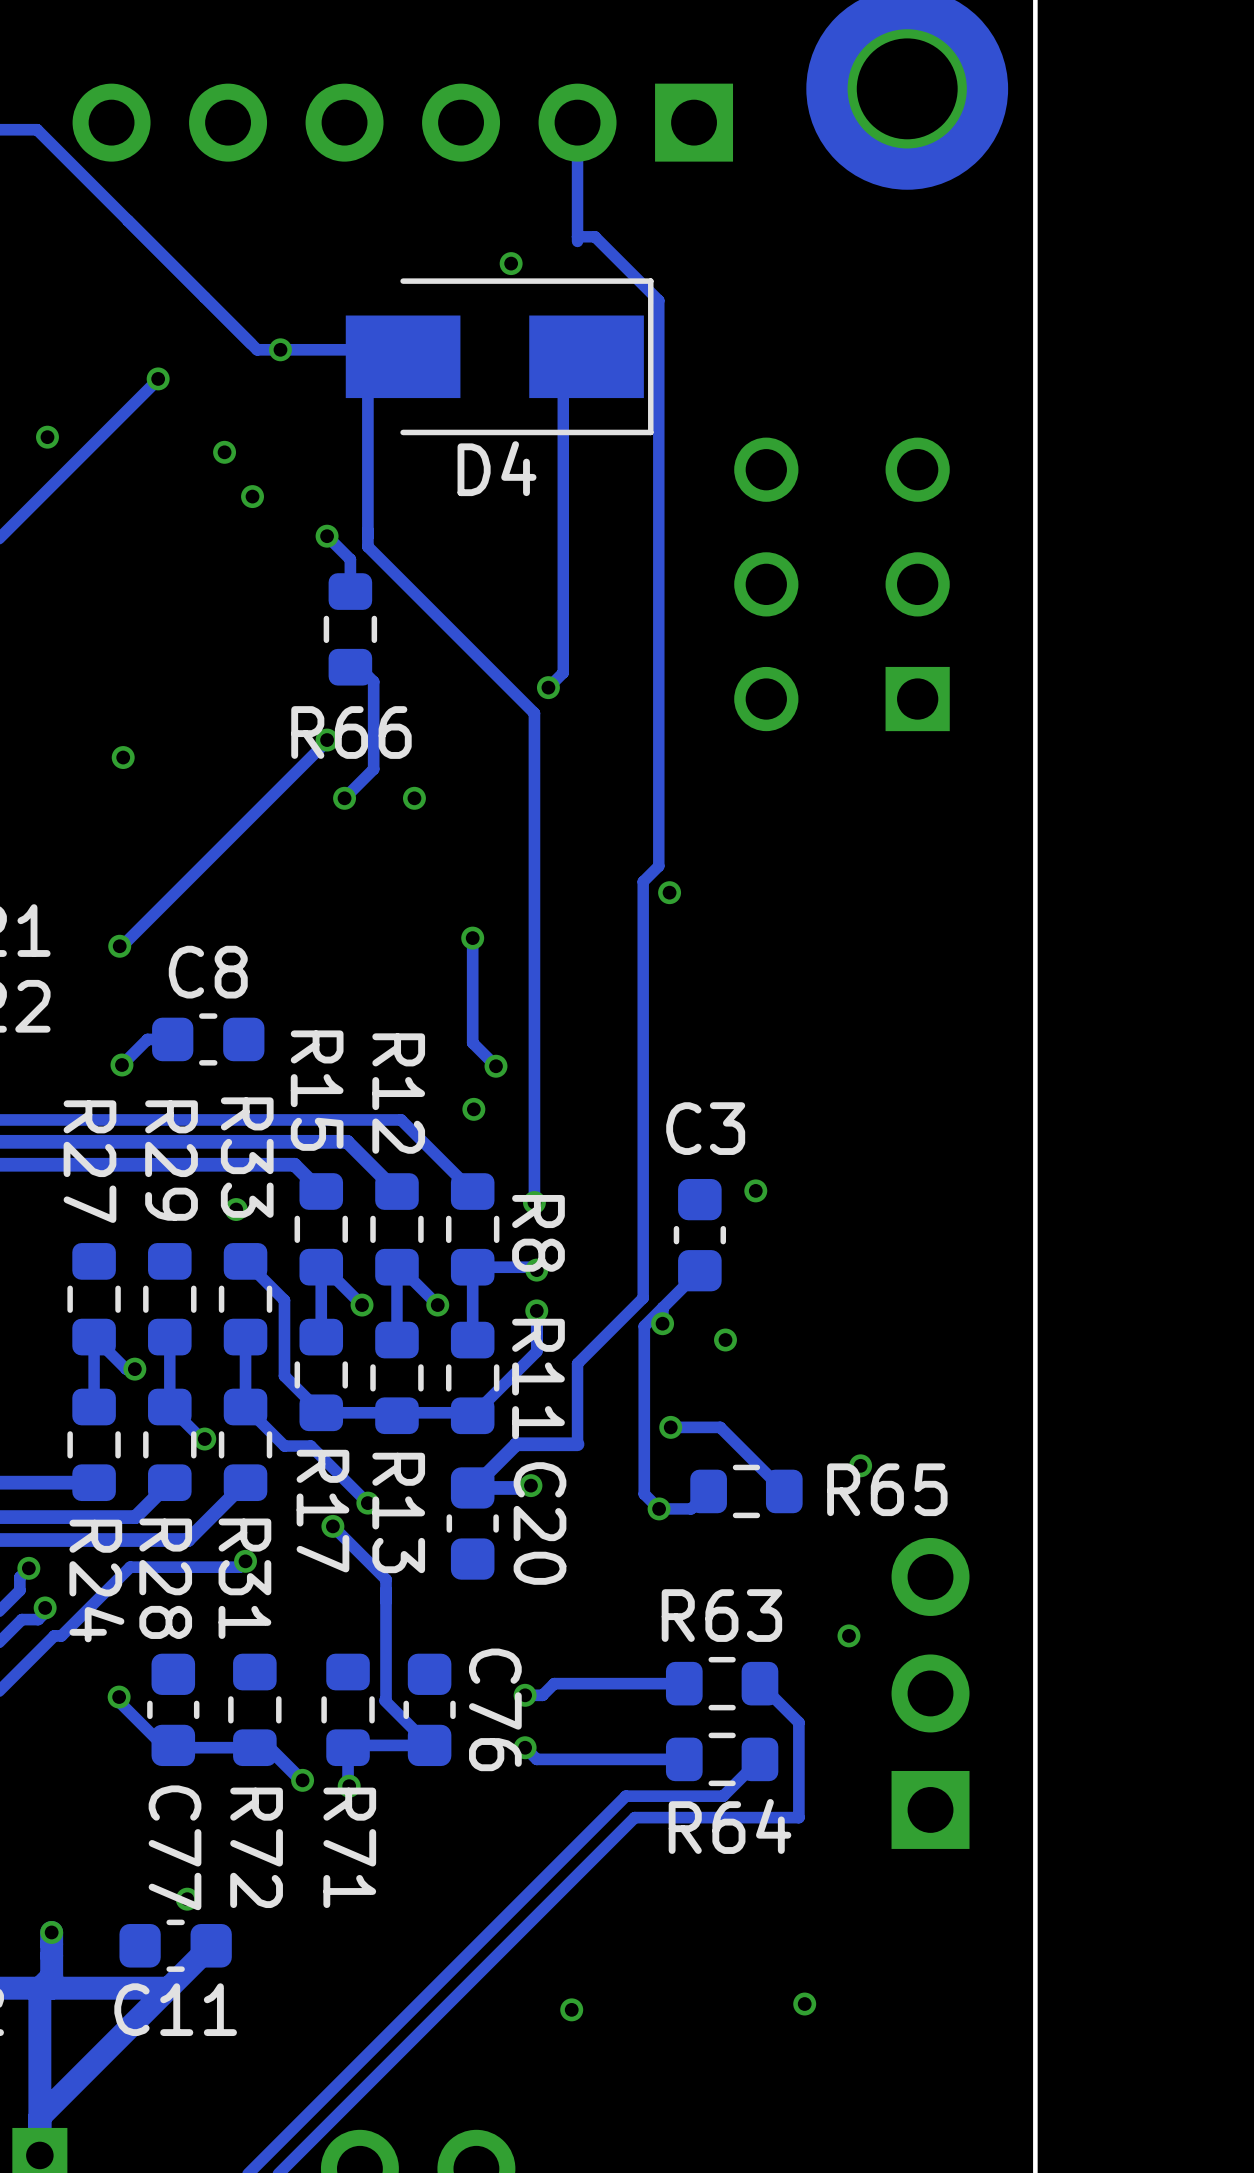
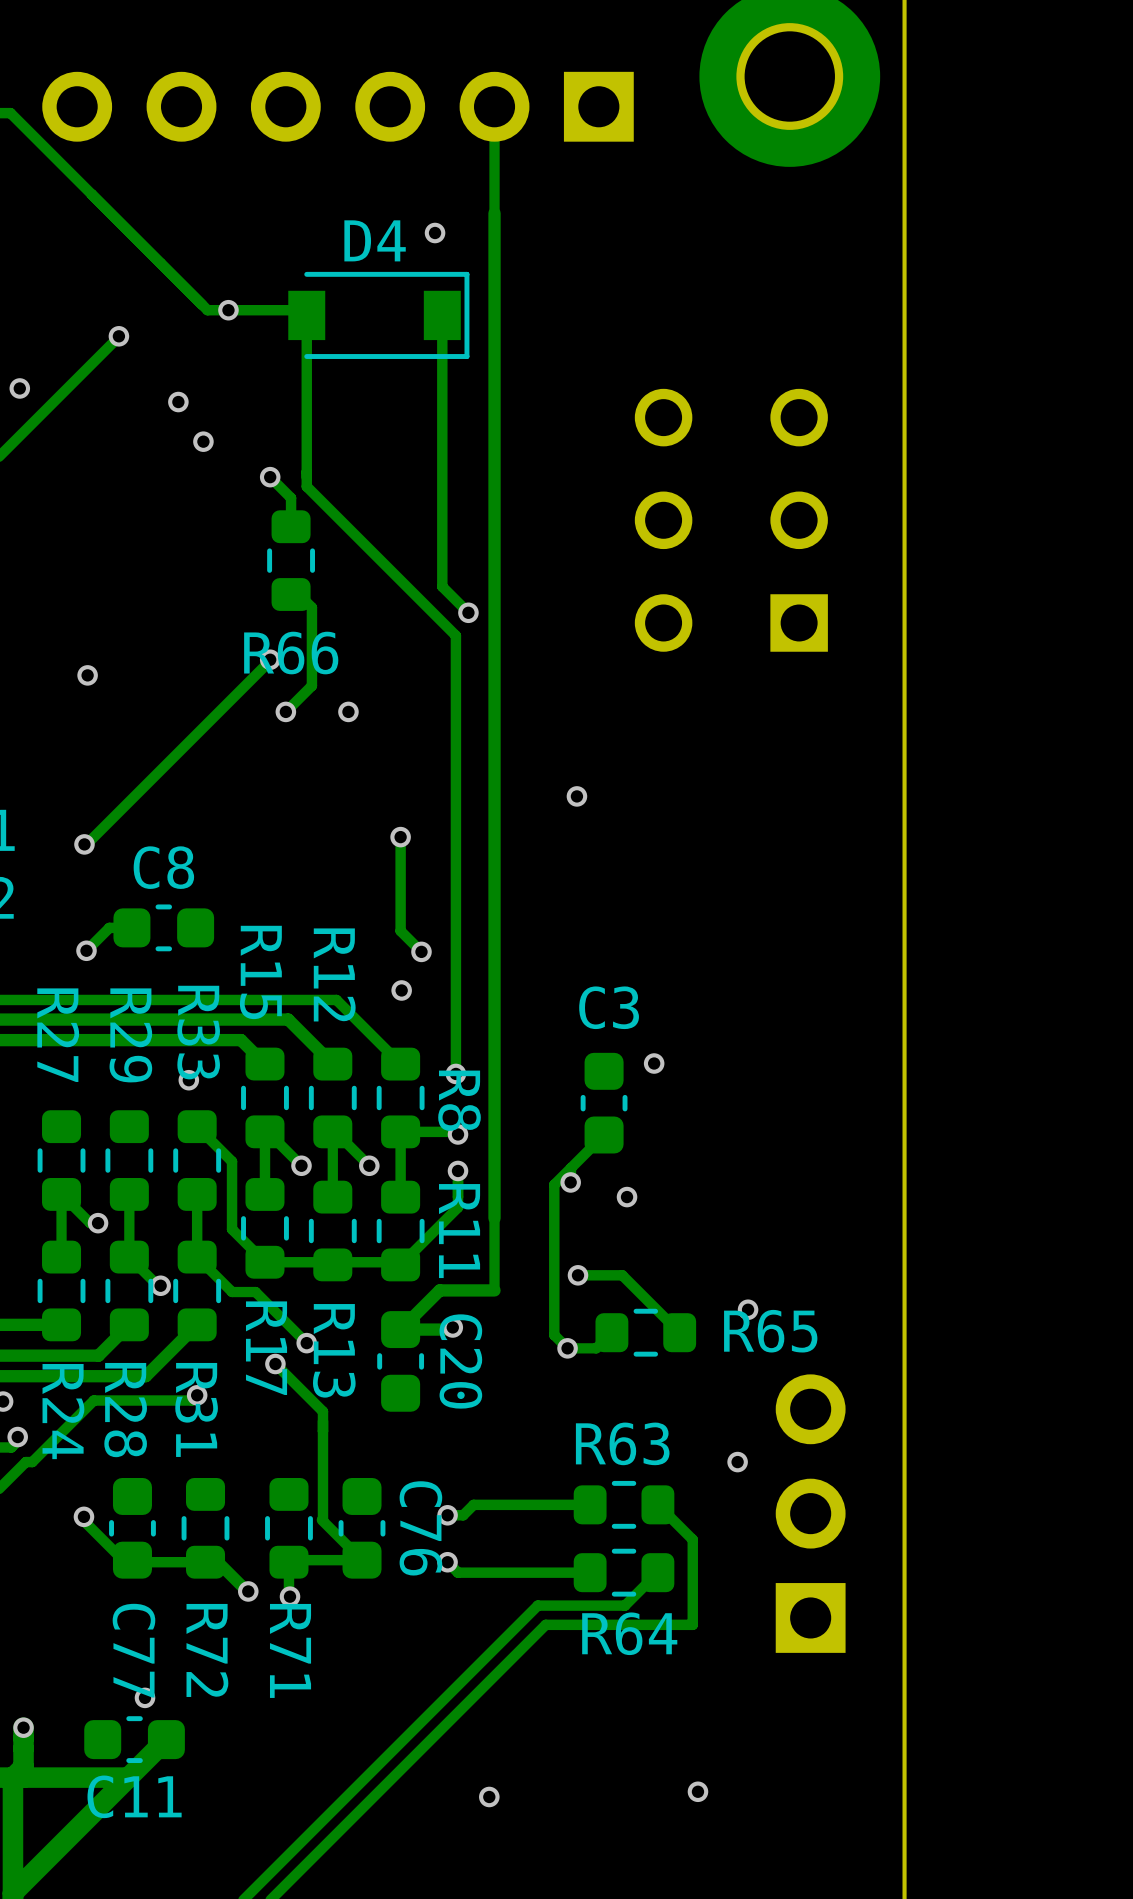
track: (577, 236) (594, 236) (658, 300) (658, 866) (643, 881) (643, 1298) (577, 1363) -> (494, 213) (494, 1218)
D4 footprint: [345, 278, 654, 436] -> [288, 271, 470, 359]
track: (563, 354) (563, 672) (548, 687) -> (442, 315) (442, 586) (468, 612)
D4 name position: D4 (497, 468) -> D4 (375, 240)

